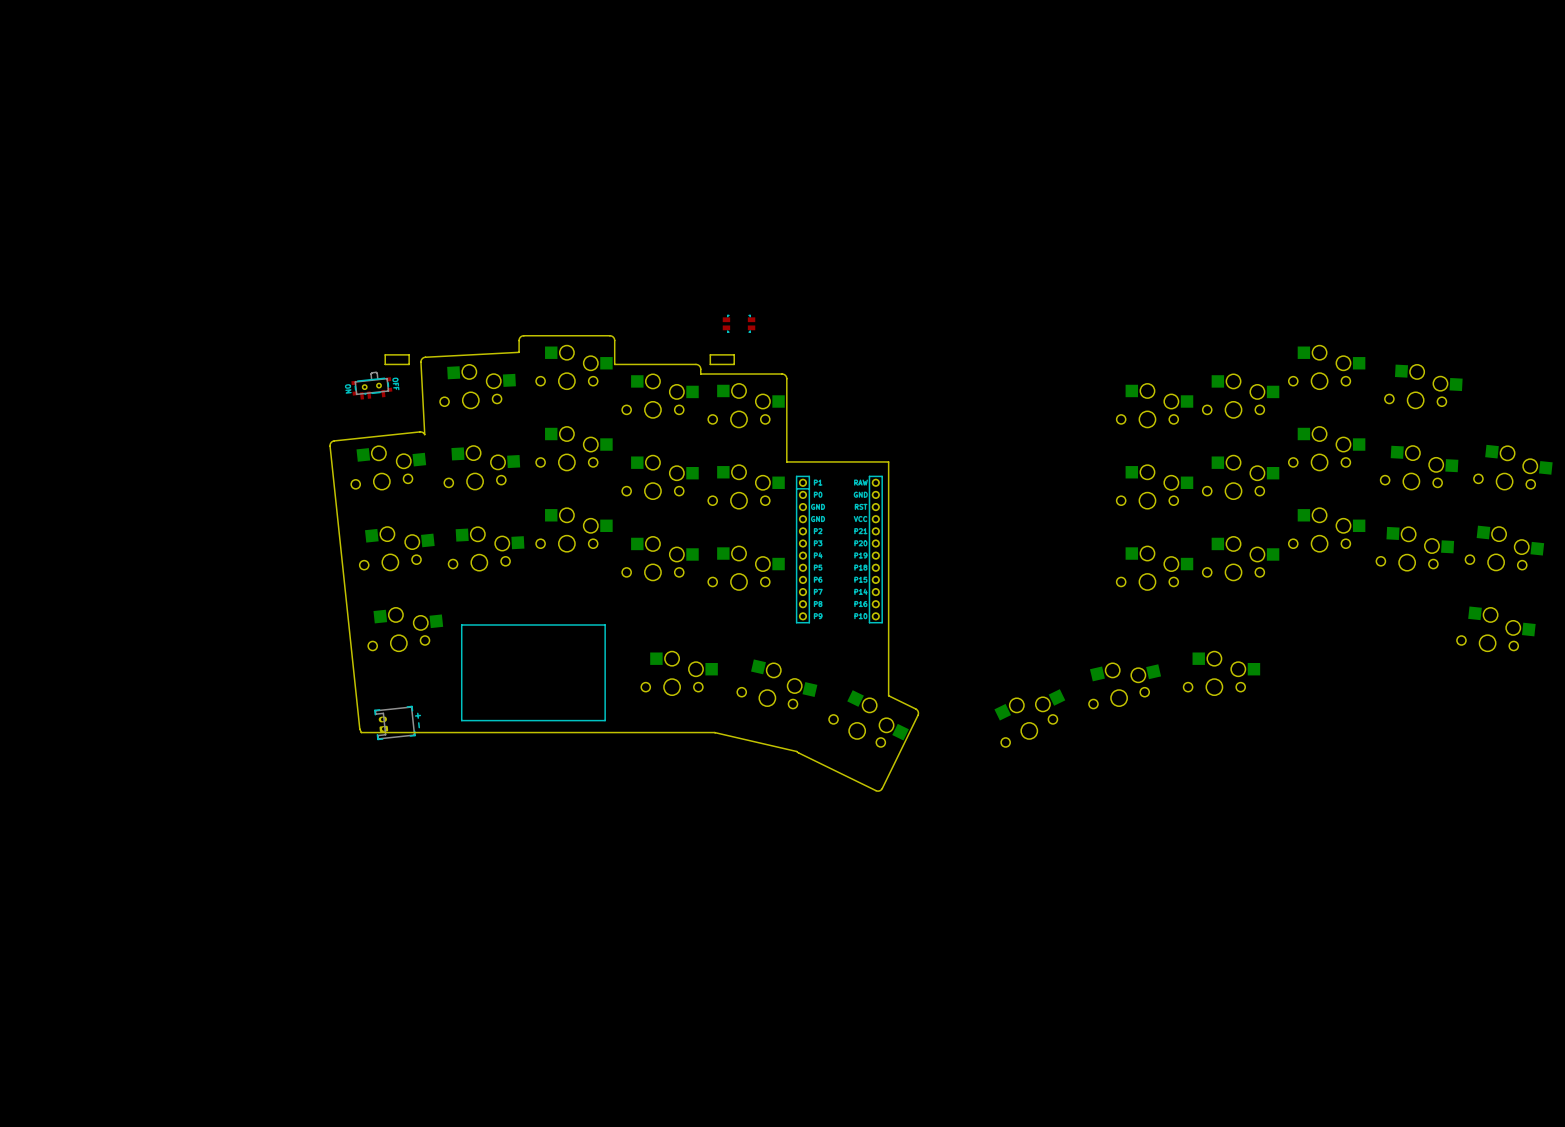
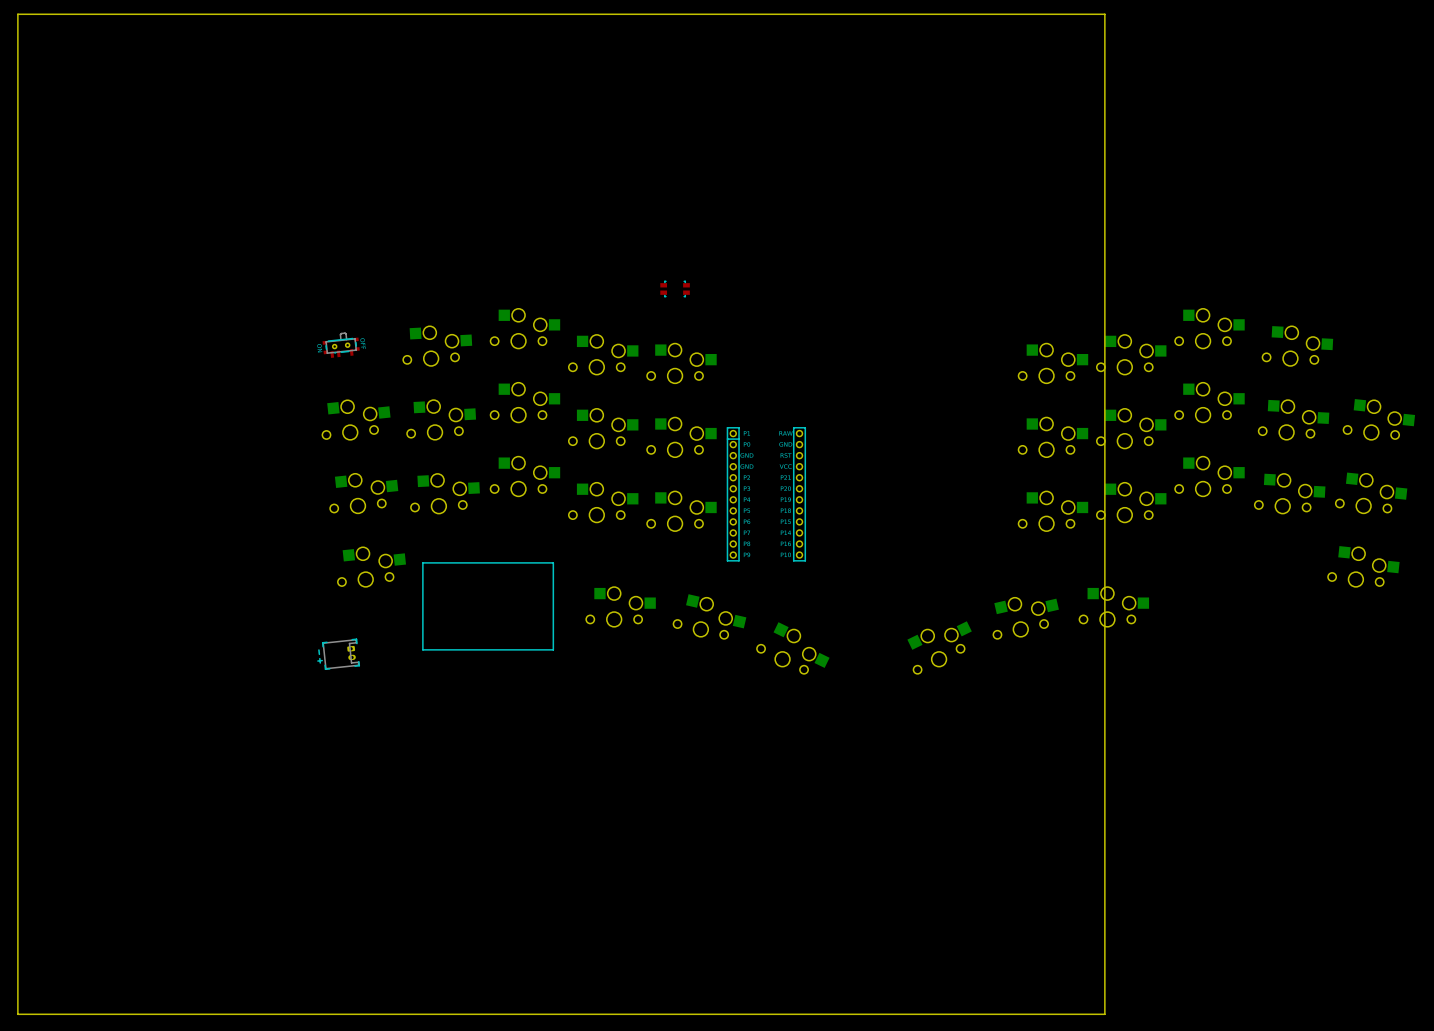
board edge: none -> (17, 14) (17, 1014) (1104, 1014) (1104, 14) (17, 14)
board edge: (523, 335) (611, 336) (614, 340) (614, 364) (696, 364) (700, 367) (700, 374) (783, 374) (786, 378) (786, 461) (888, 461) (888, 695) (916, 709) (918, 713) (881, 790) (875, 790) (796, 751) (714, 732) (361, 732) (330, 444) (334, 440) (419, 431) (424, 434) (422, 358) (519, 352) (519, 338) (523, 335) -> none
board edge: (385, 354) (385, 364) (409, 364) (409, 354) (385, 354) -> none
board edge: (710, 354) (734, 354) (734, 364) (710, 364) (710, 354) -> none
part rotation: 0° (397, 722) -> 180° (338, 654)
part position: (397, 722) -> (338, 654)

